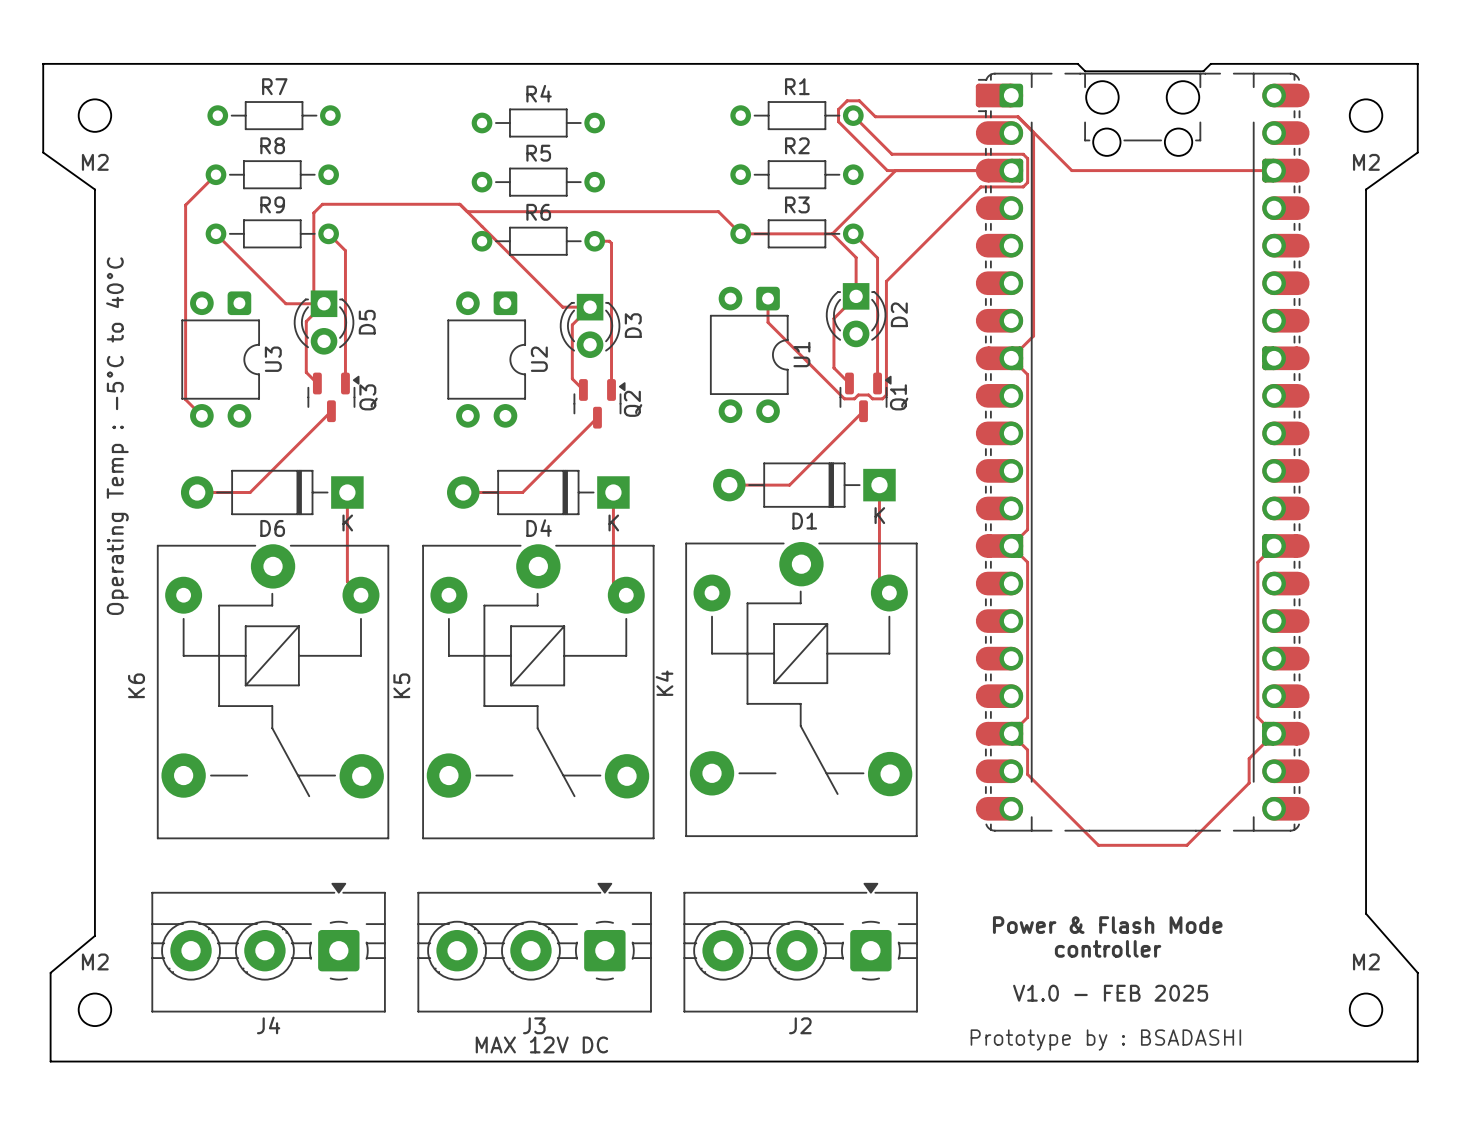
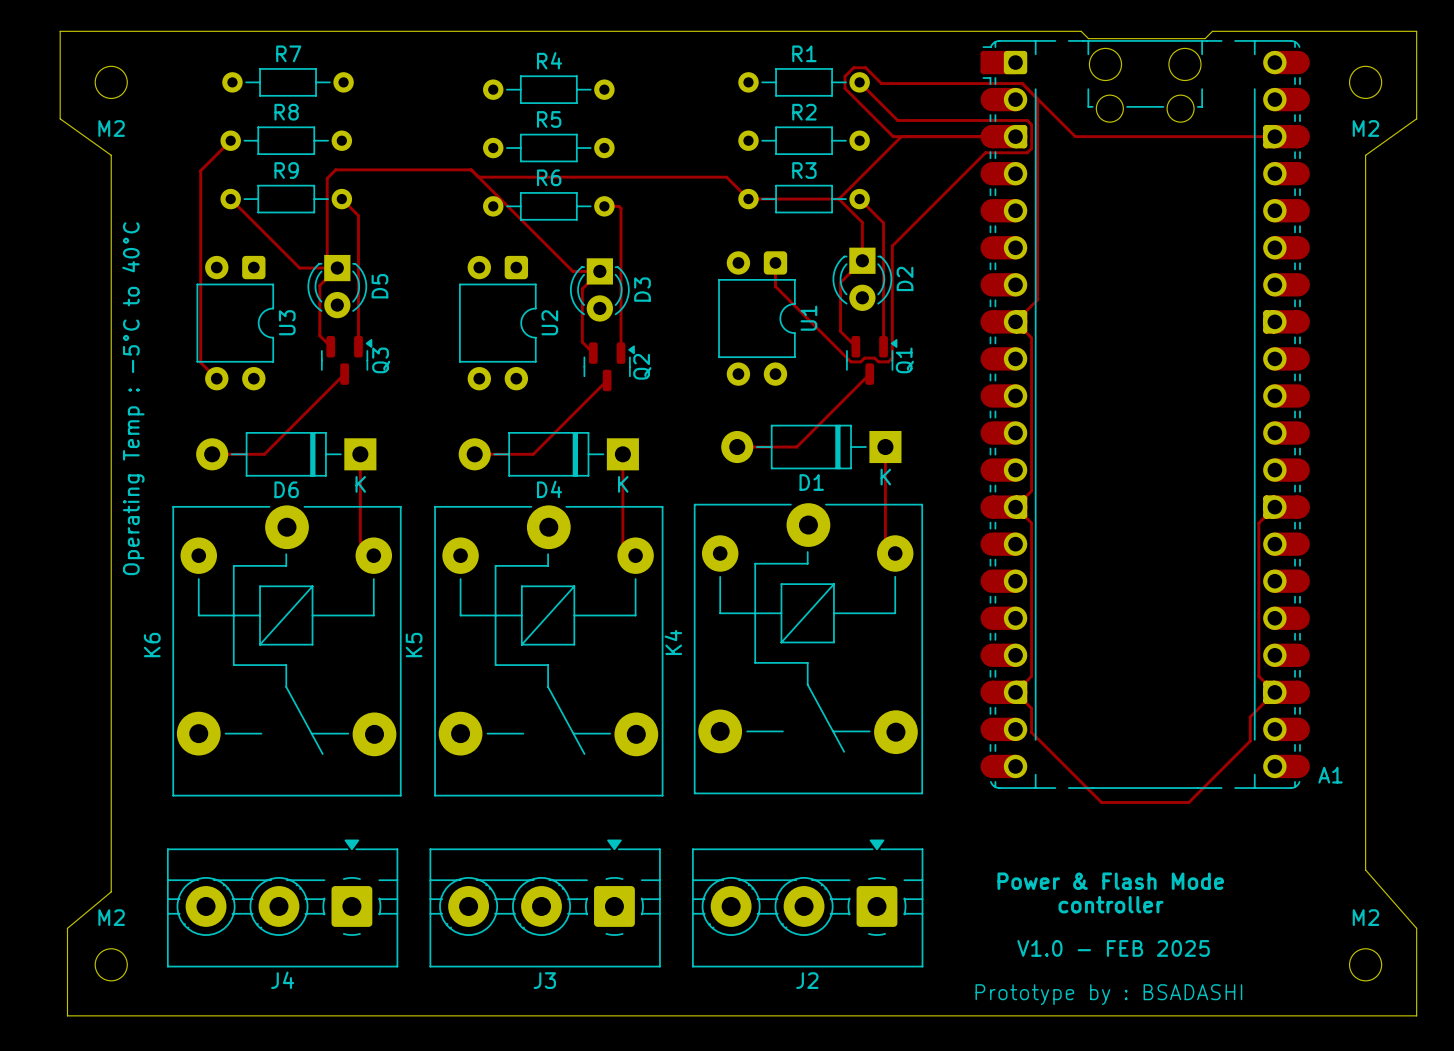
A1 name: none -> A1 (1330, 775)
text: MAX 12V DC (541, 1044) -> none

